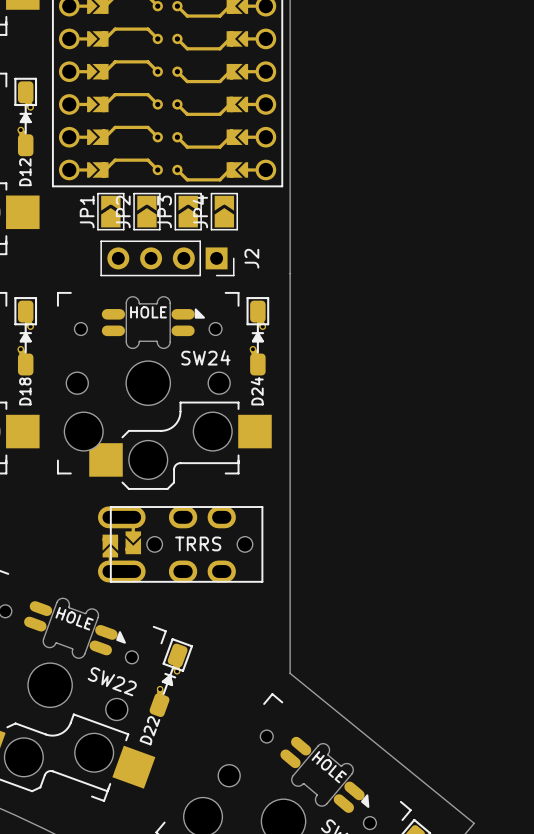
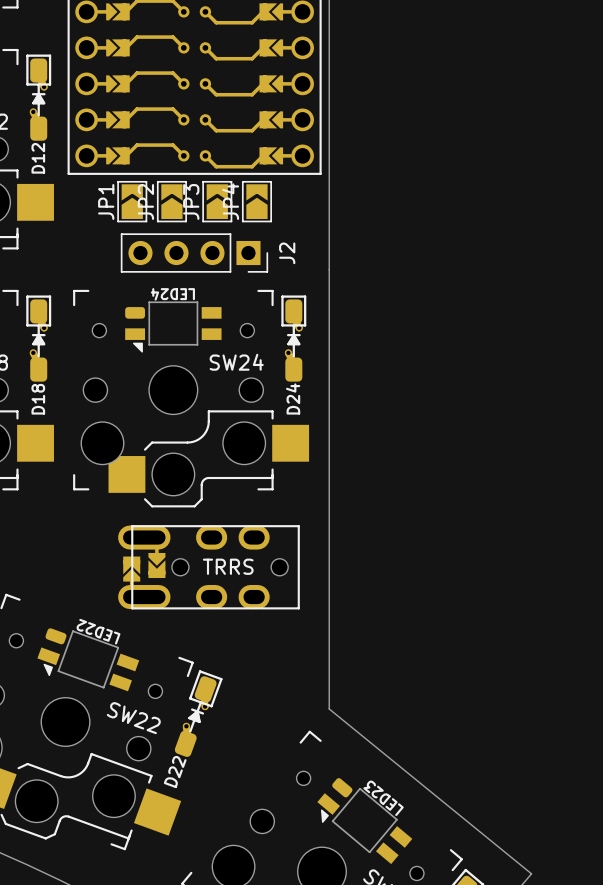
part: (153, 322) -> none
LED24: none -> (173, 326)
LED22: none -> (88, 659)
part: (74, 628) -> none
part: (324, 774) -> none
LED23: none -> (364, 821)

